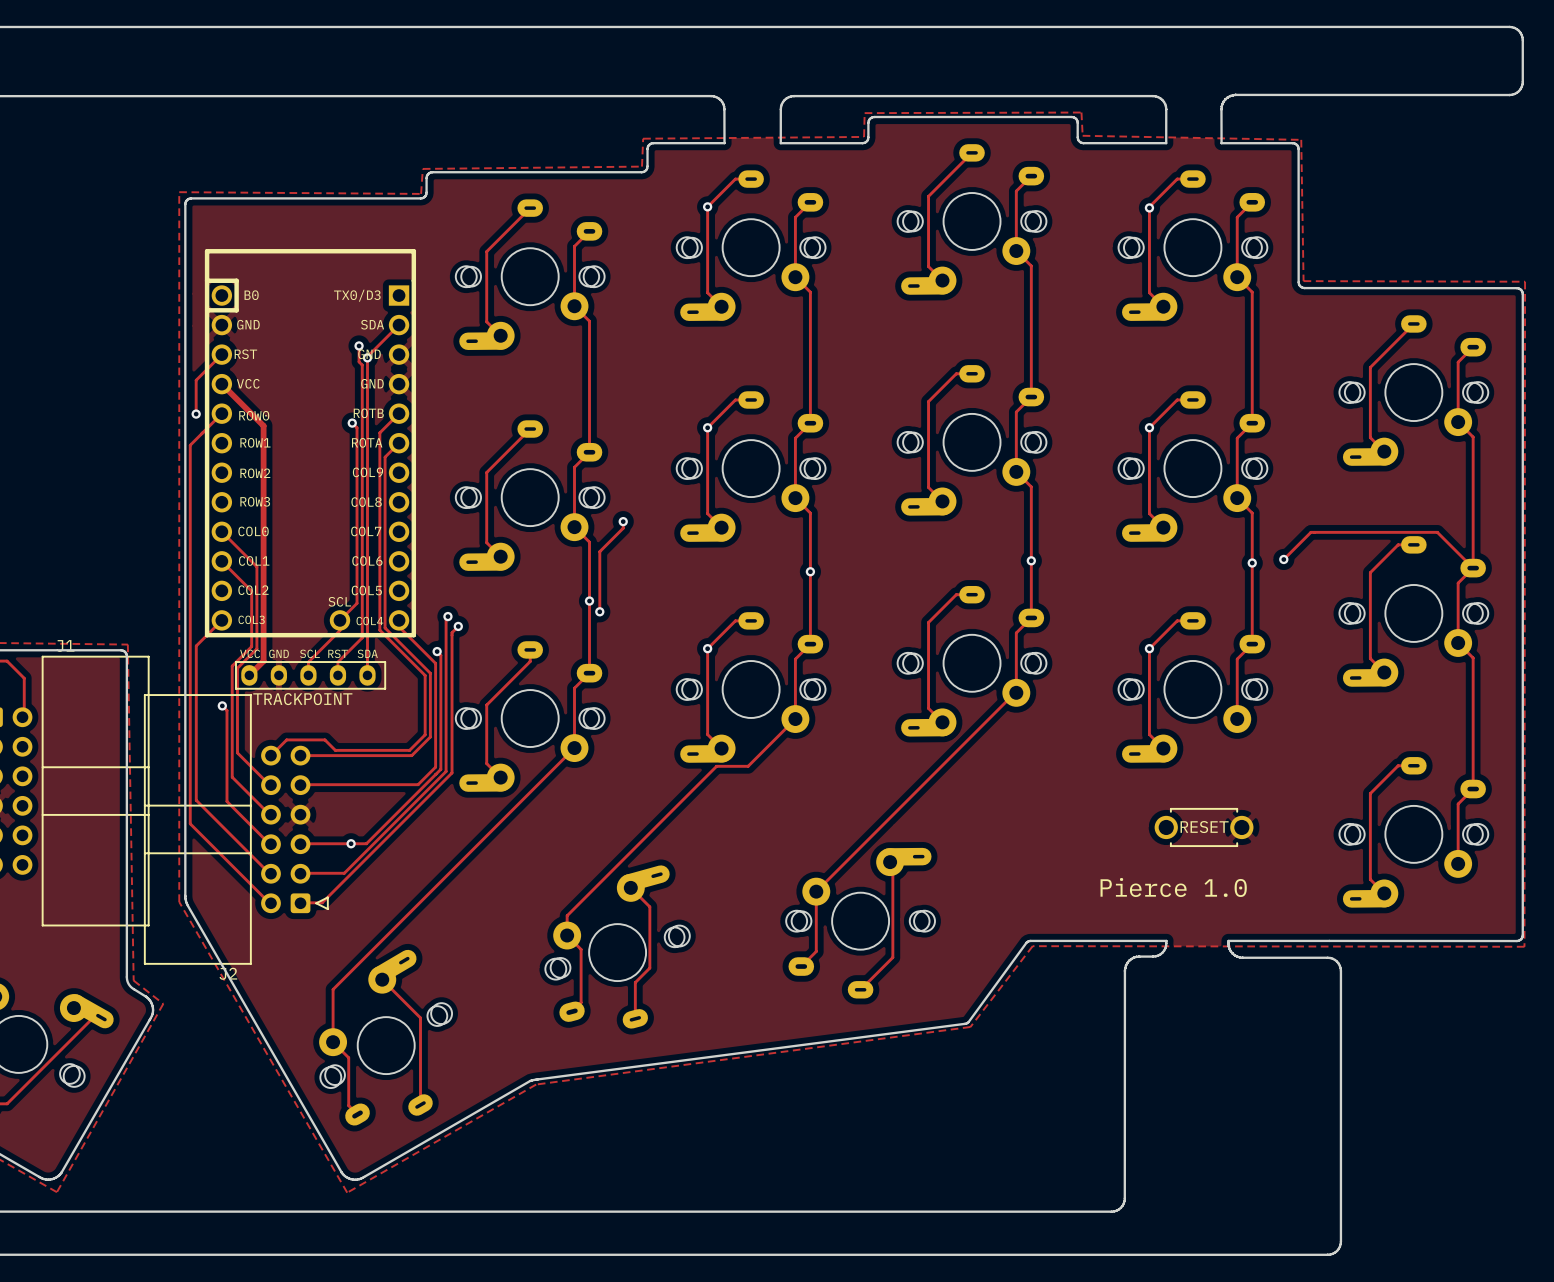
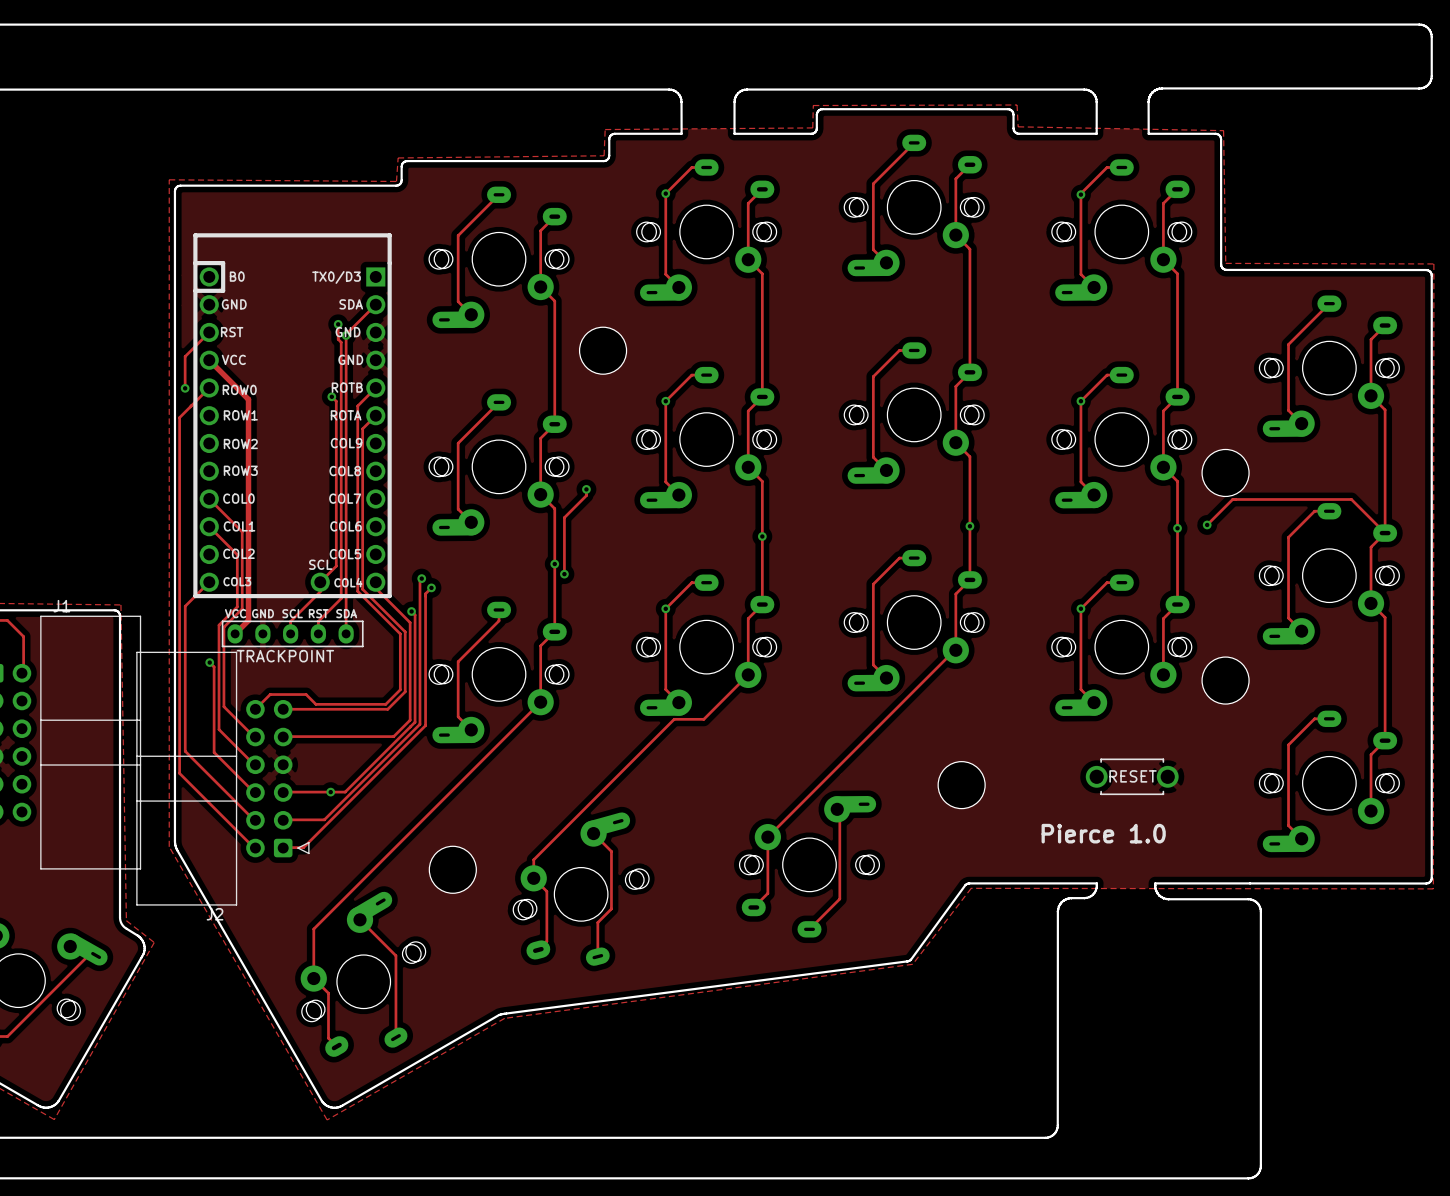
part: none -> (603, 350)
part: none -> (1225, 472)
part: none -> (1225, 680)
part: none -> (961, 785)
part: none -> (452, 869)

